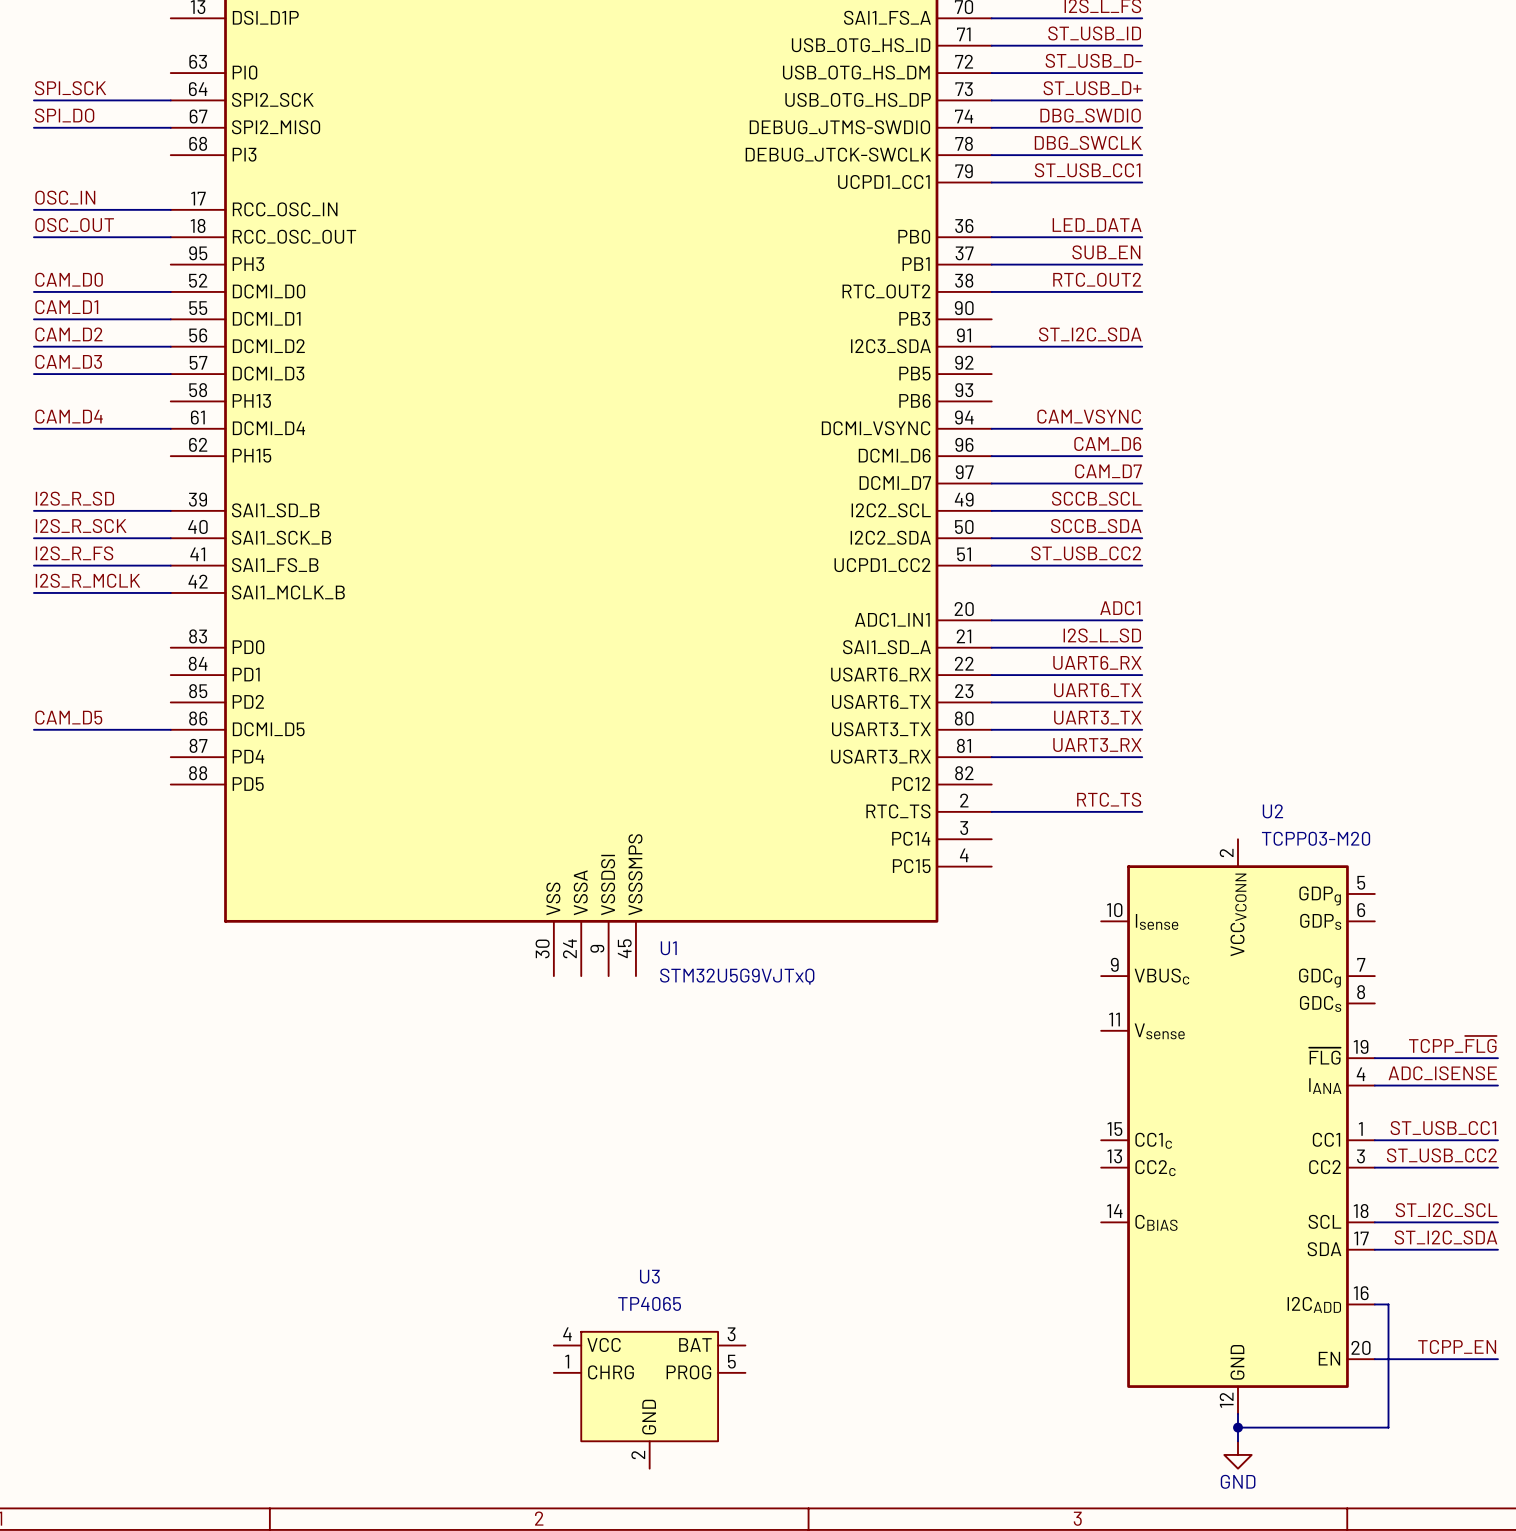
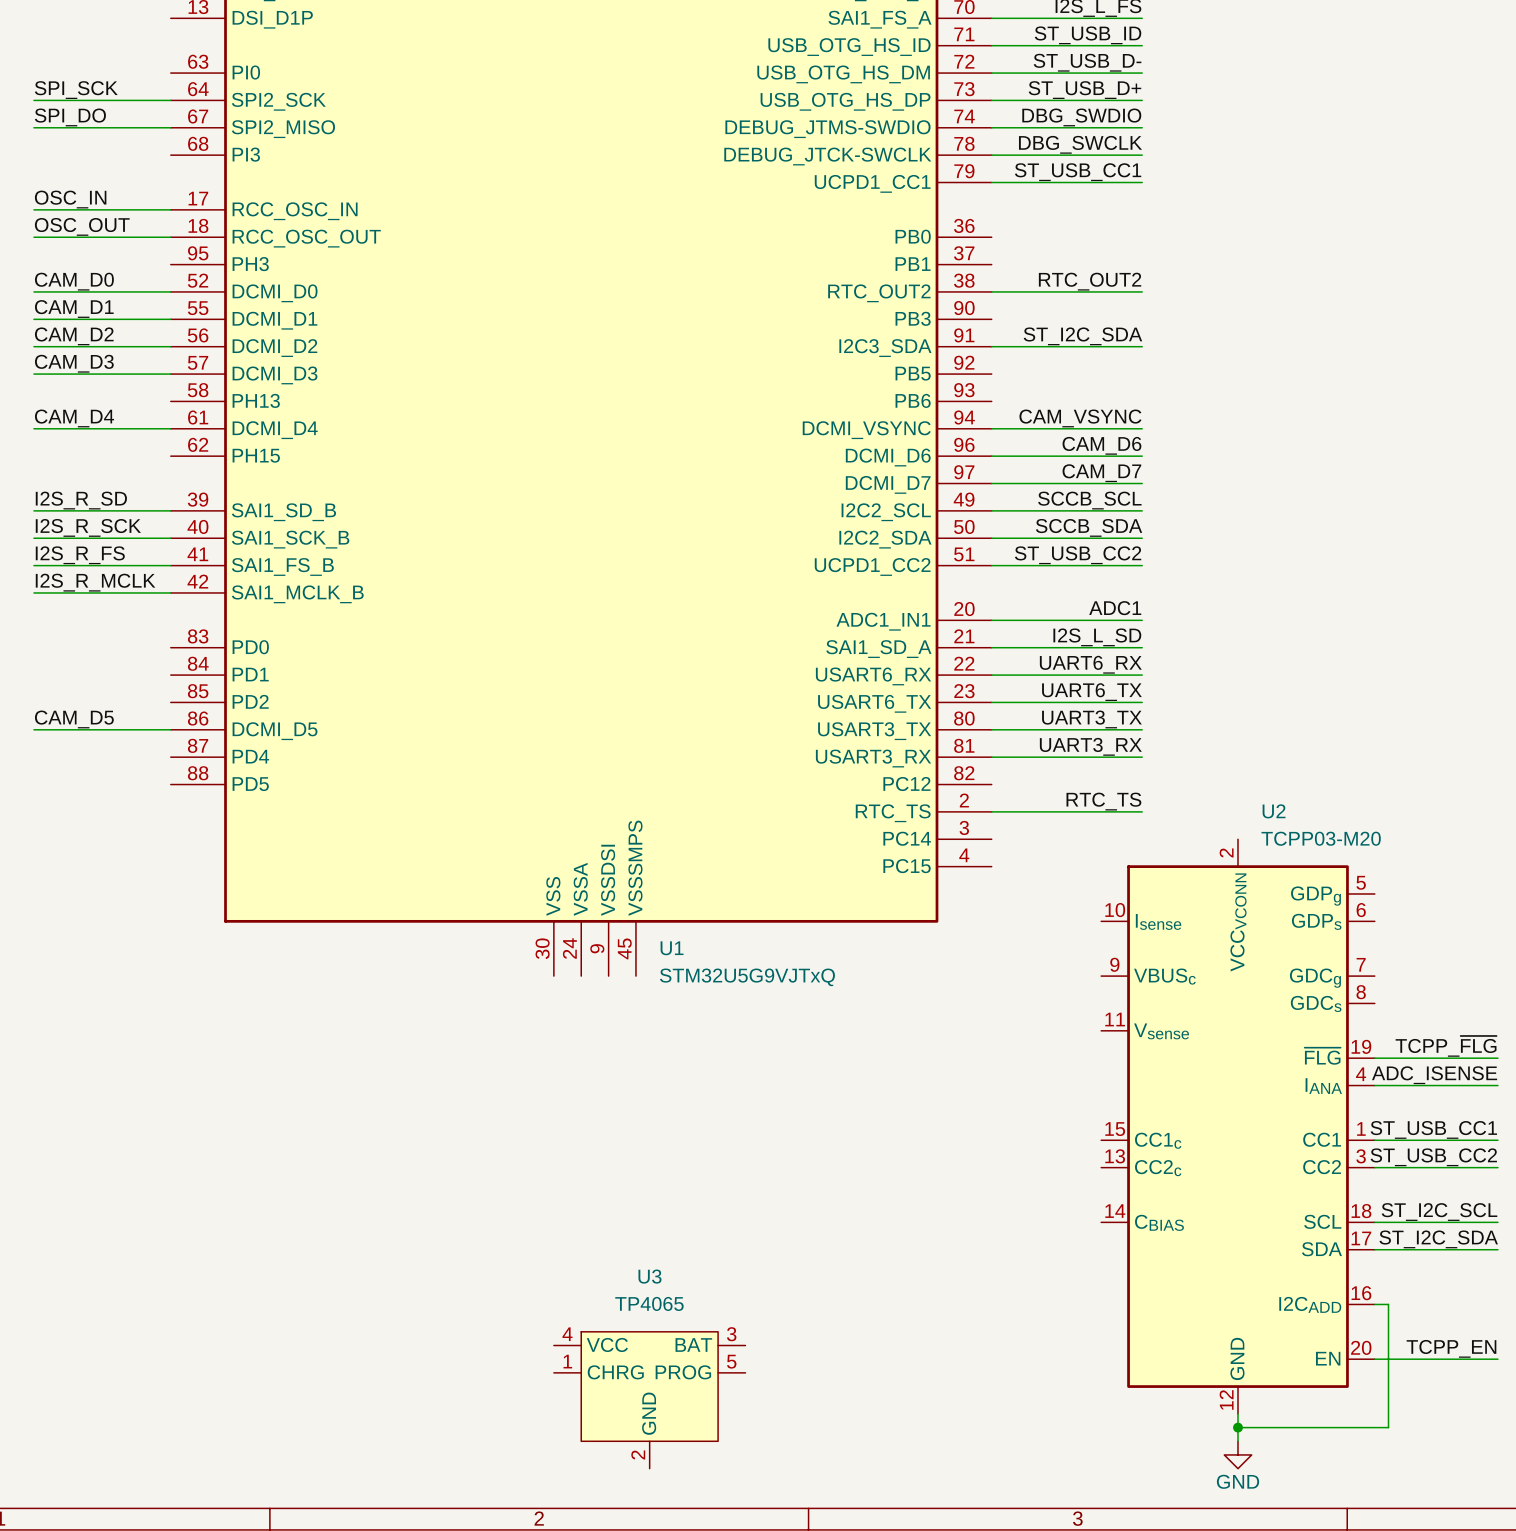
label: LED_DATA (1097, 225) -> none
wire: (991, 237) (1142, 237) -> none
label: SUB_EN (1106, 252) -> none
wire: (991, 264) (1142, 264) -> none

